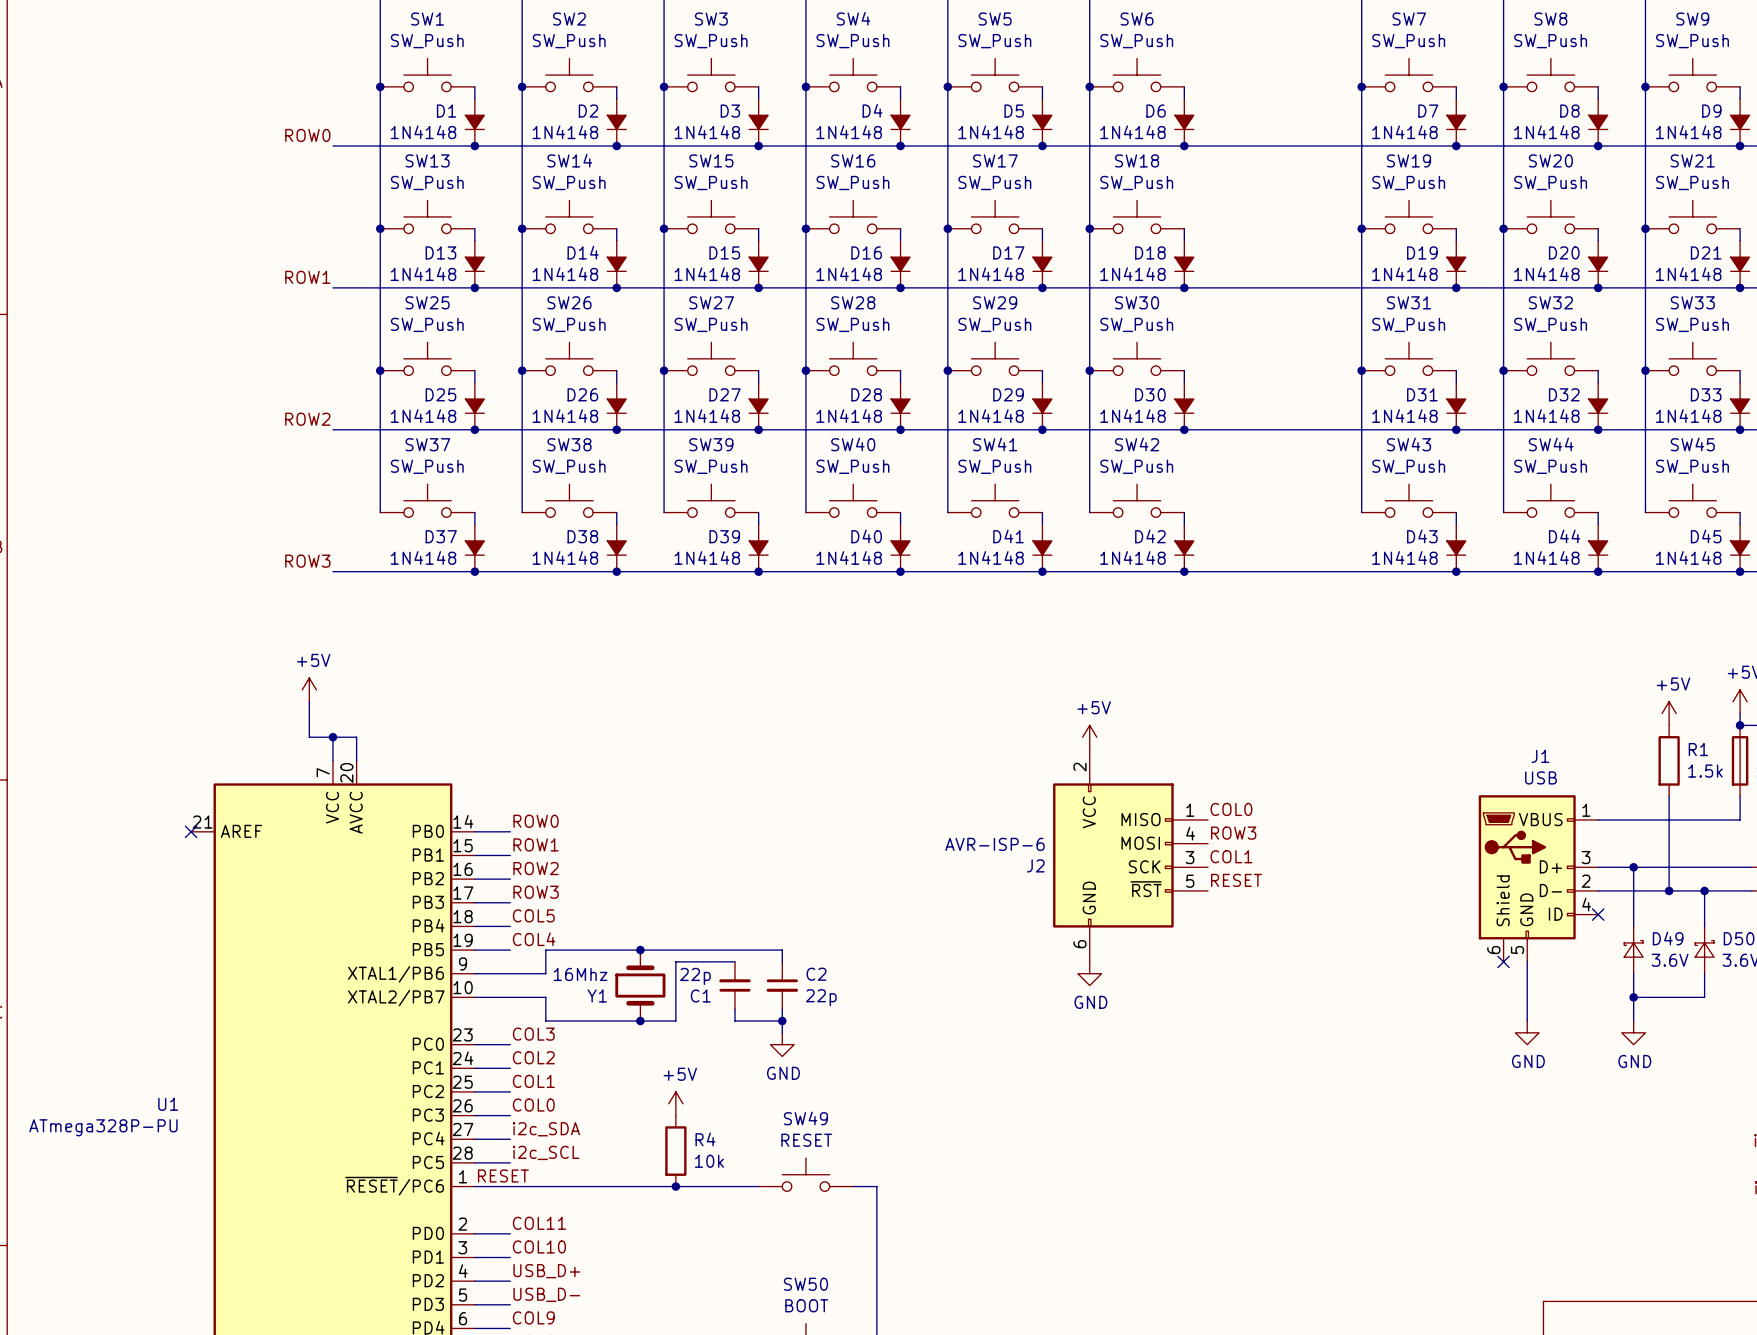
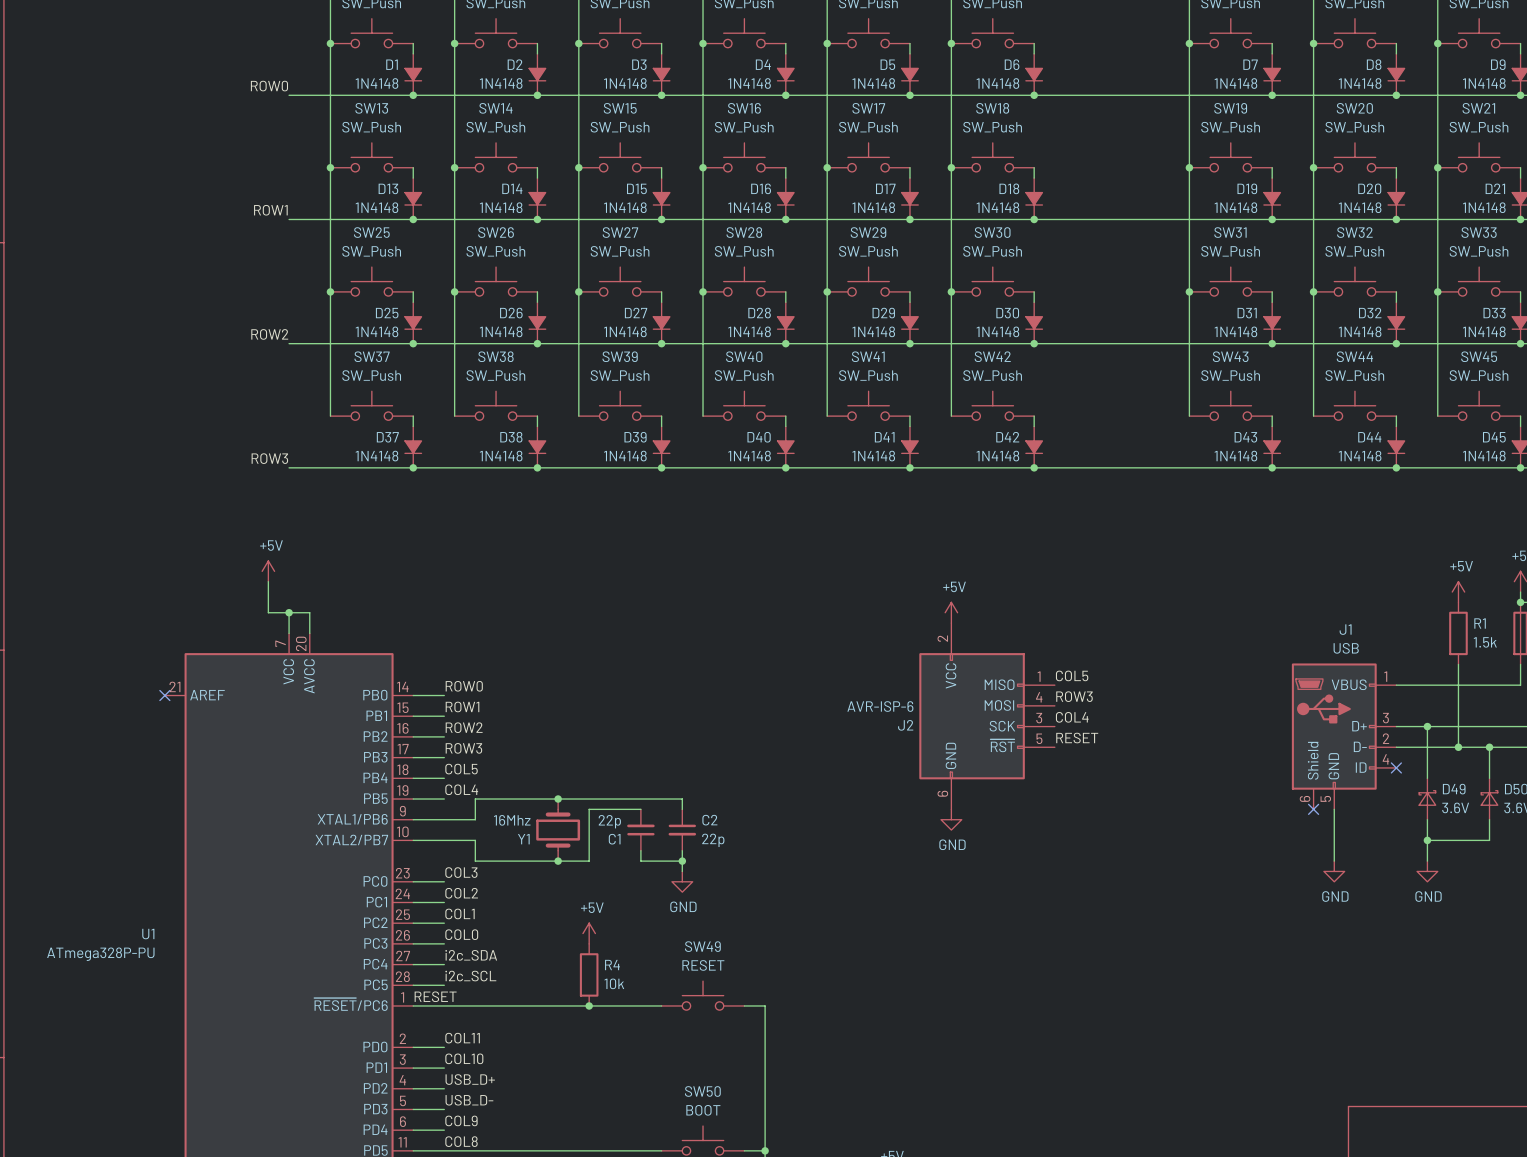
label: COL0 (1231, 809) -> COL5 (1072, 675)
label: COL1 (1231, 856) -> COL4 (1072, 717)

